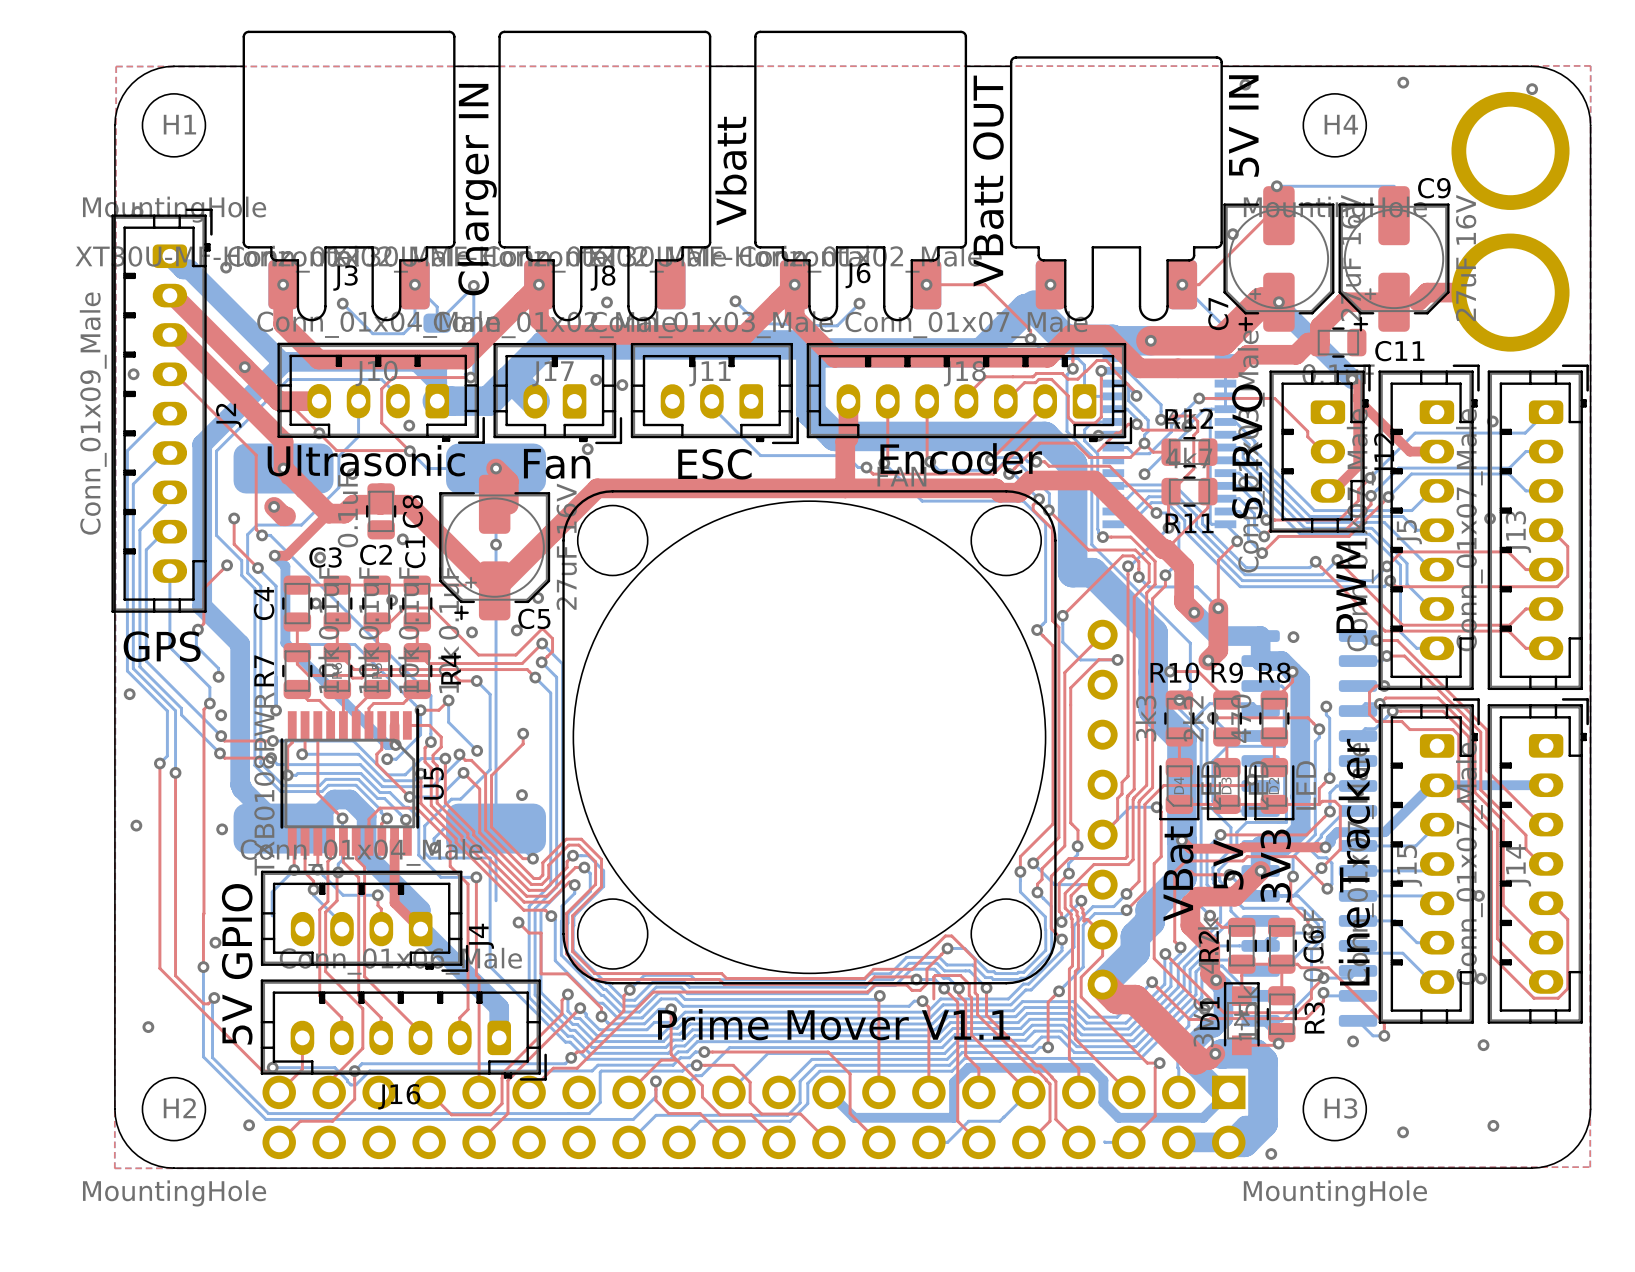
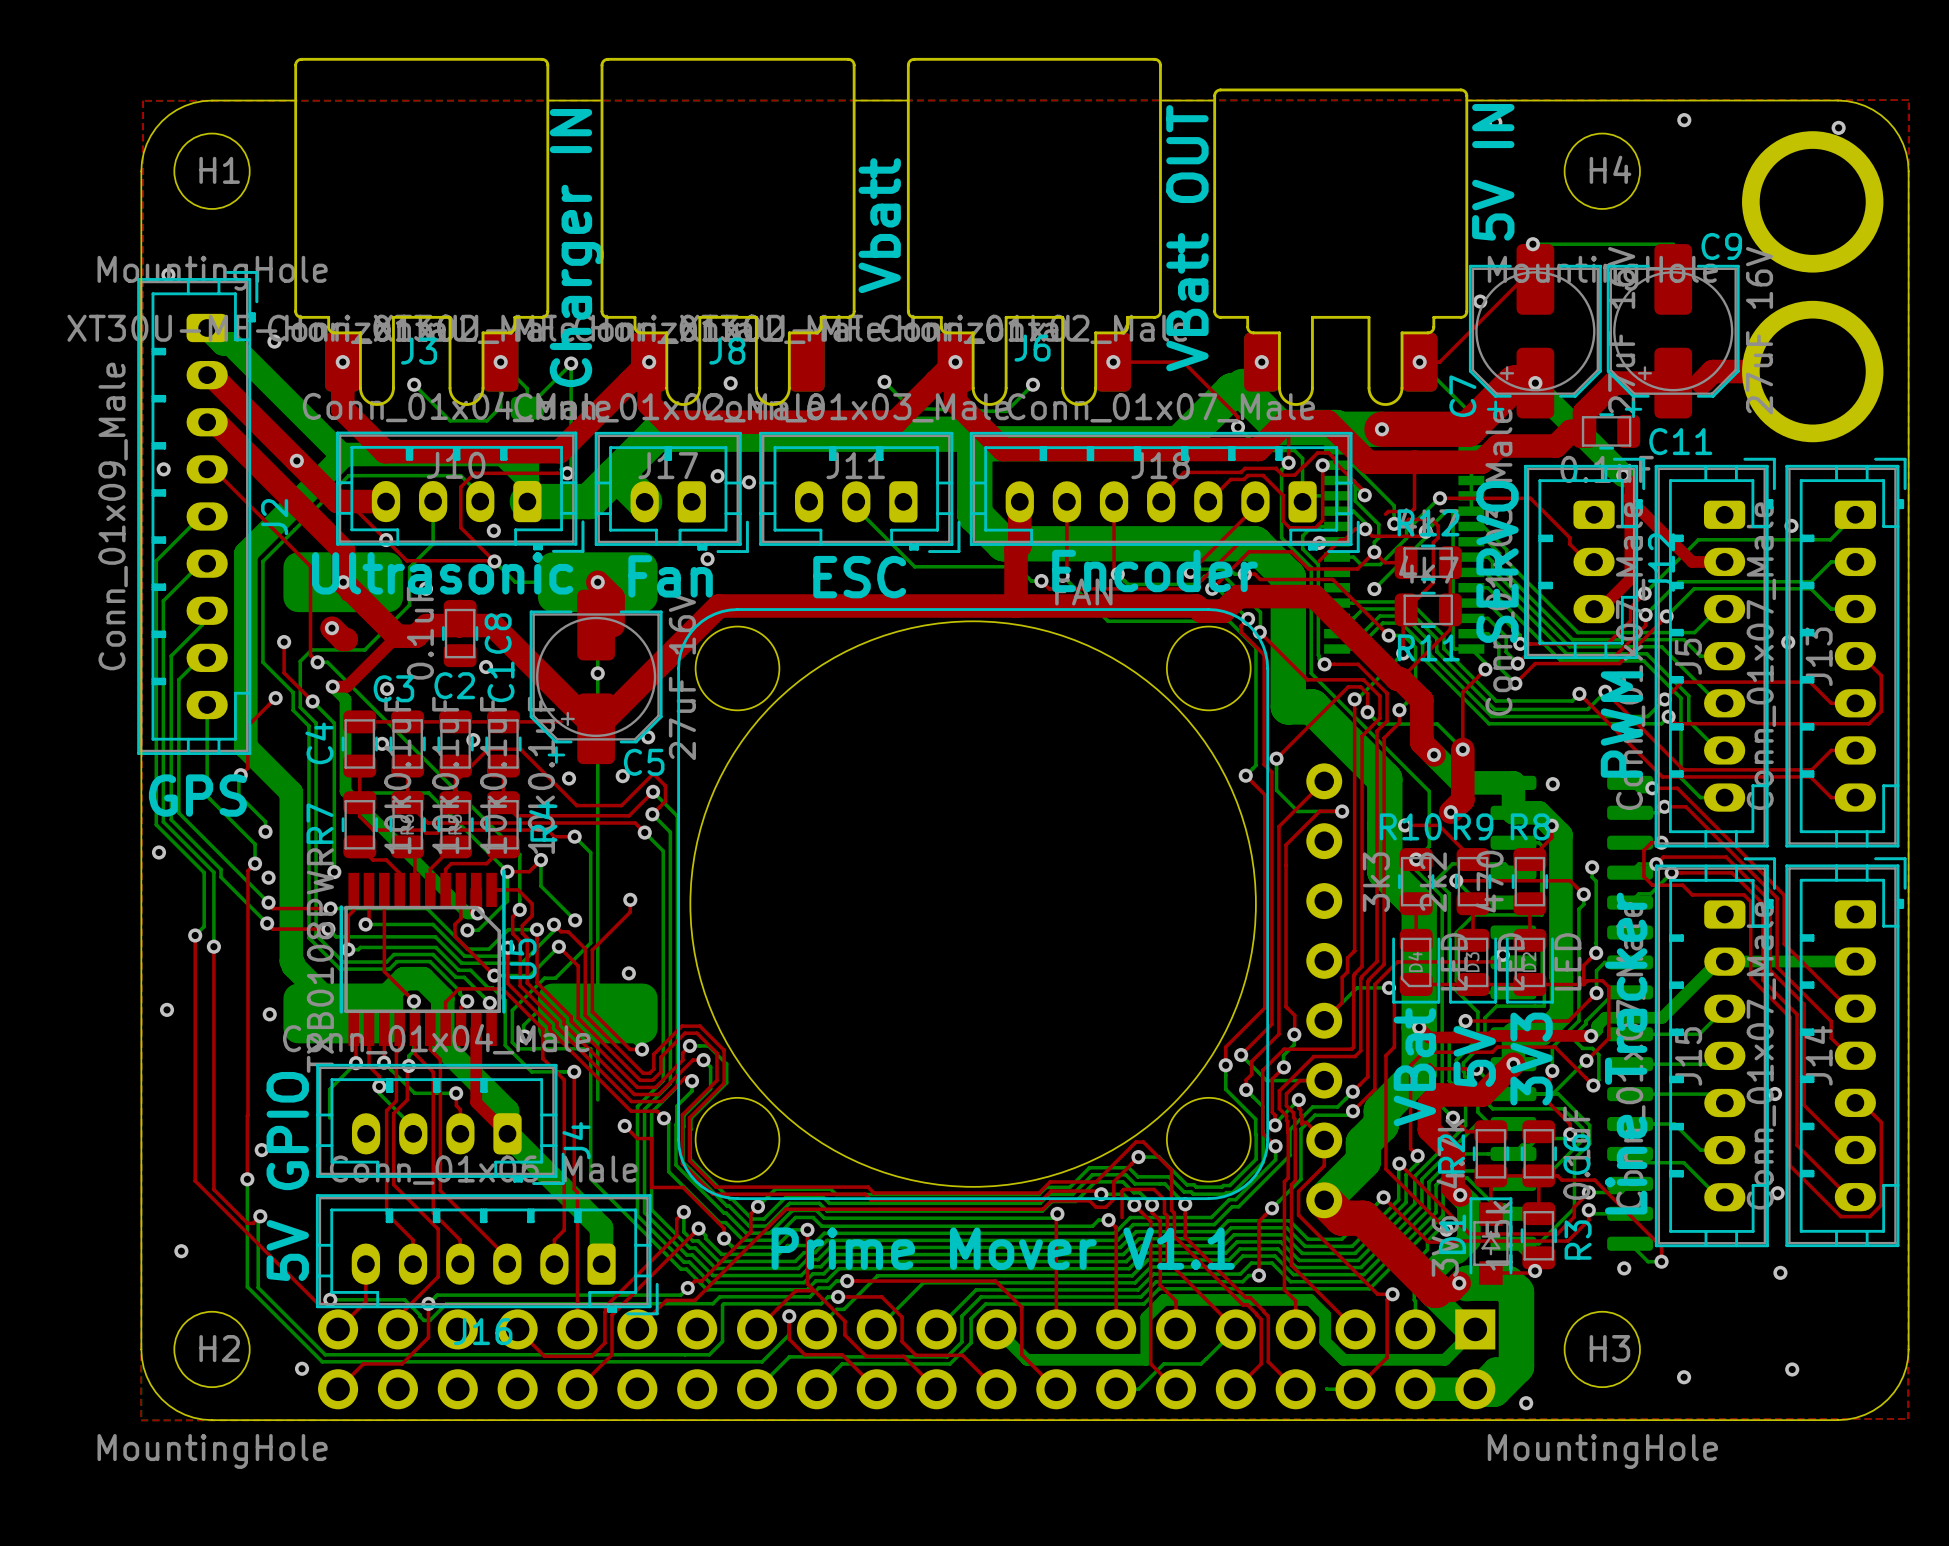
top track: none -> (1414, 462) (1414, 508) (1411, 511) (1388, 511) (1385, 514)

